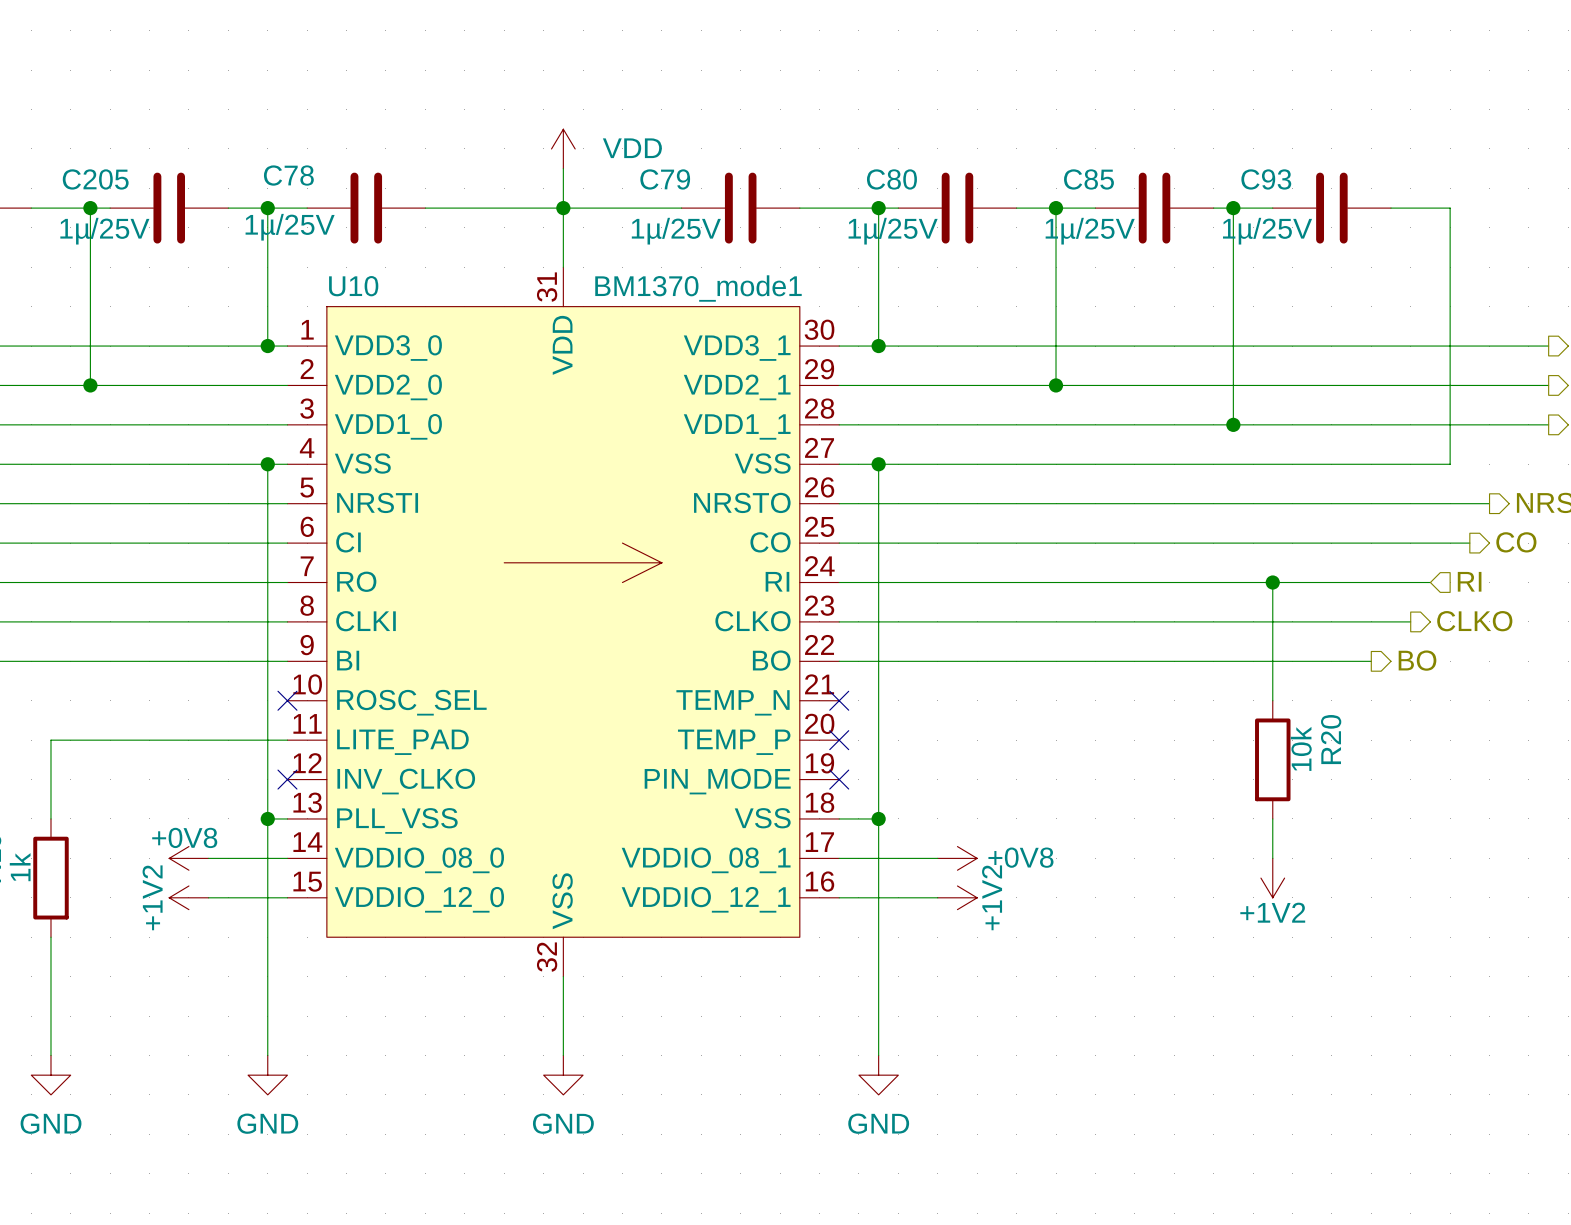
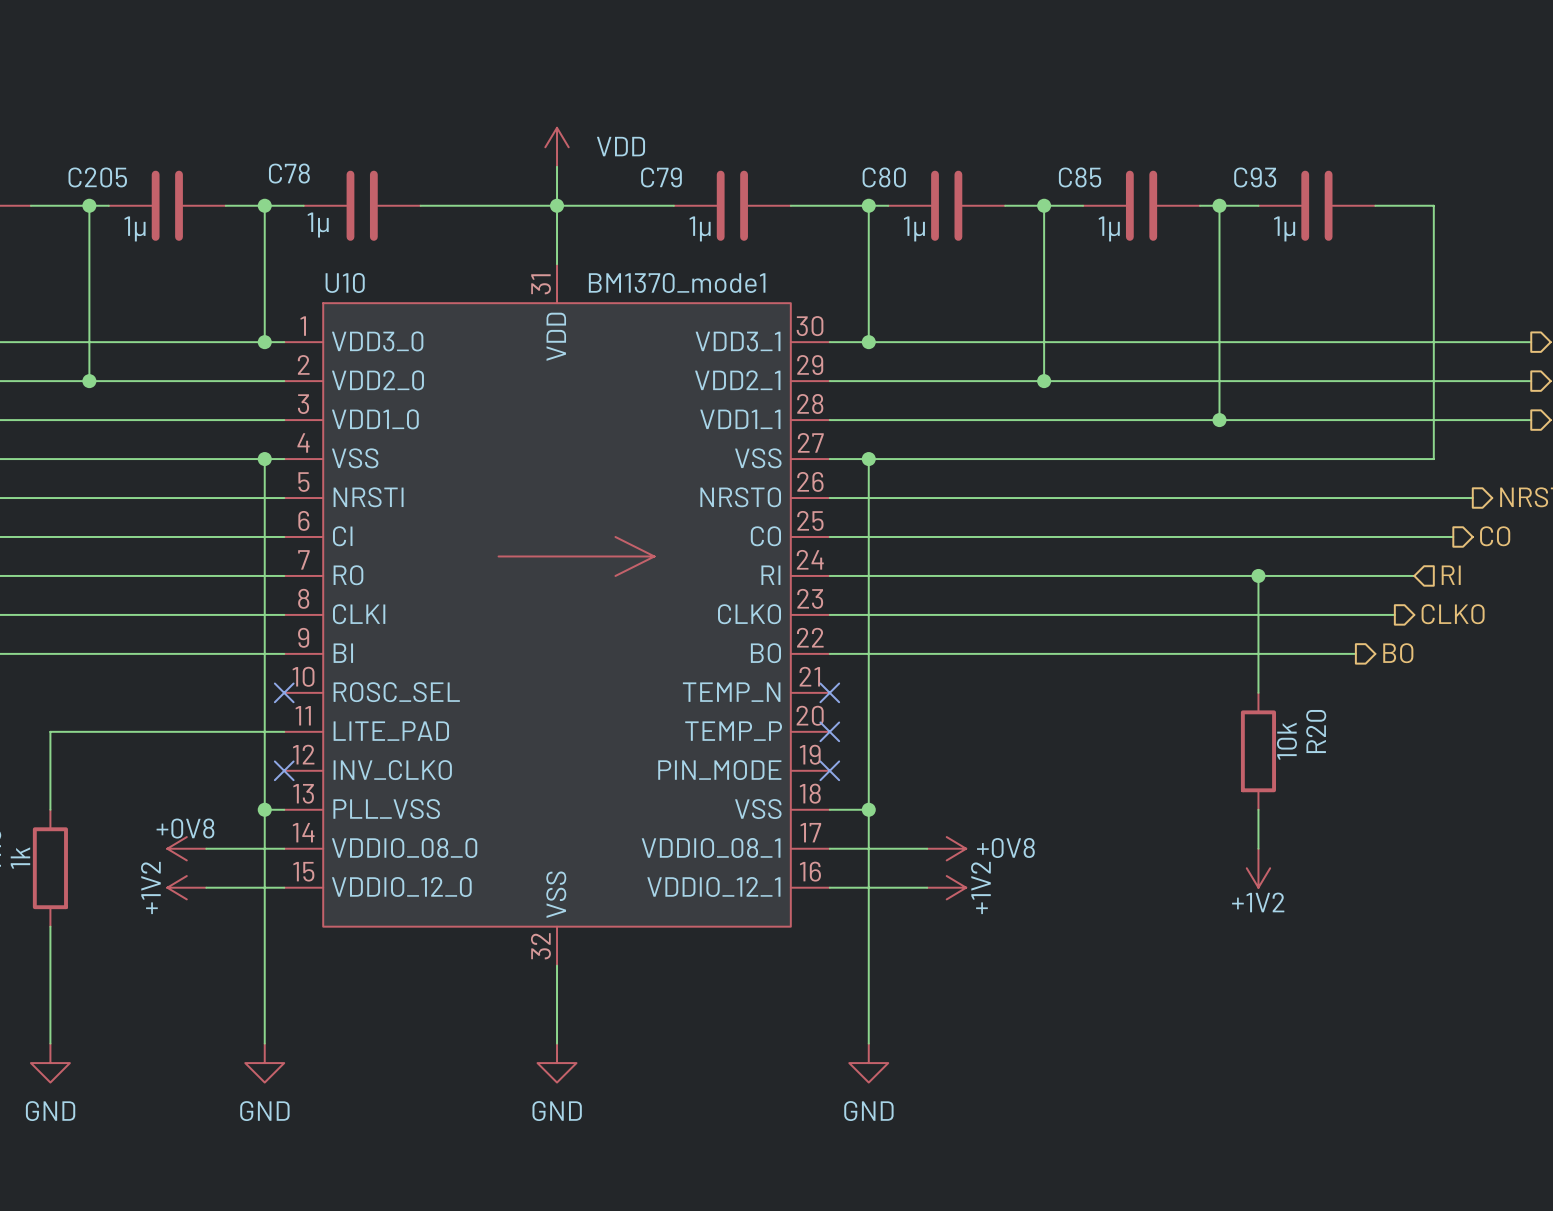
C78 value: 1µ/25V (290, 227) -> 1µ (318, 225)
C205 value: 1µ/25V (104, 231) -> 1µ (135, 228)
C79 value: 1µ/25V (676, 231) -> 1µ (700, 228)
C80 value: 1µ/25V (893, 231) -> 1µ (914, 228)
C85 value: 1µ/25V (1090, 231) -> 1µ (1109, 228)
C93 value: 1µ/25V (1267, 231) -> 1µ (1284, 228)

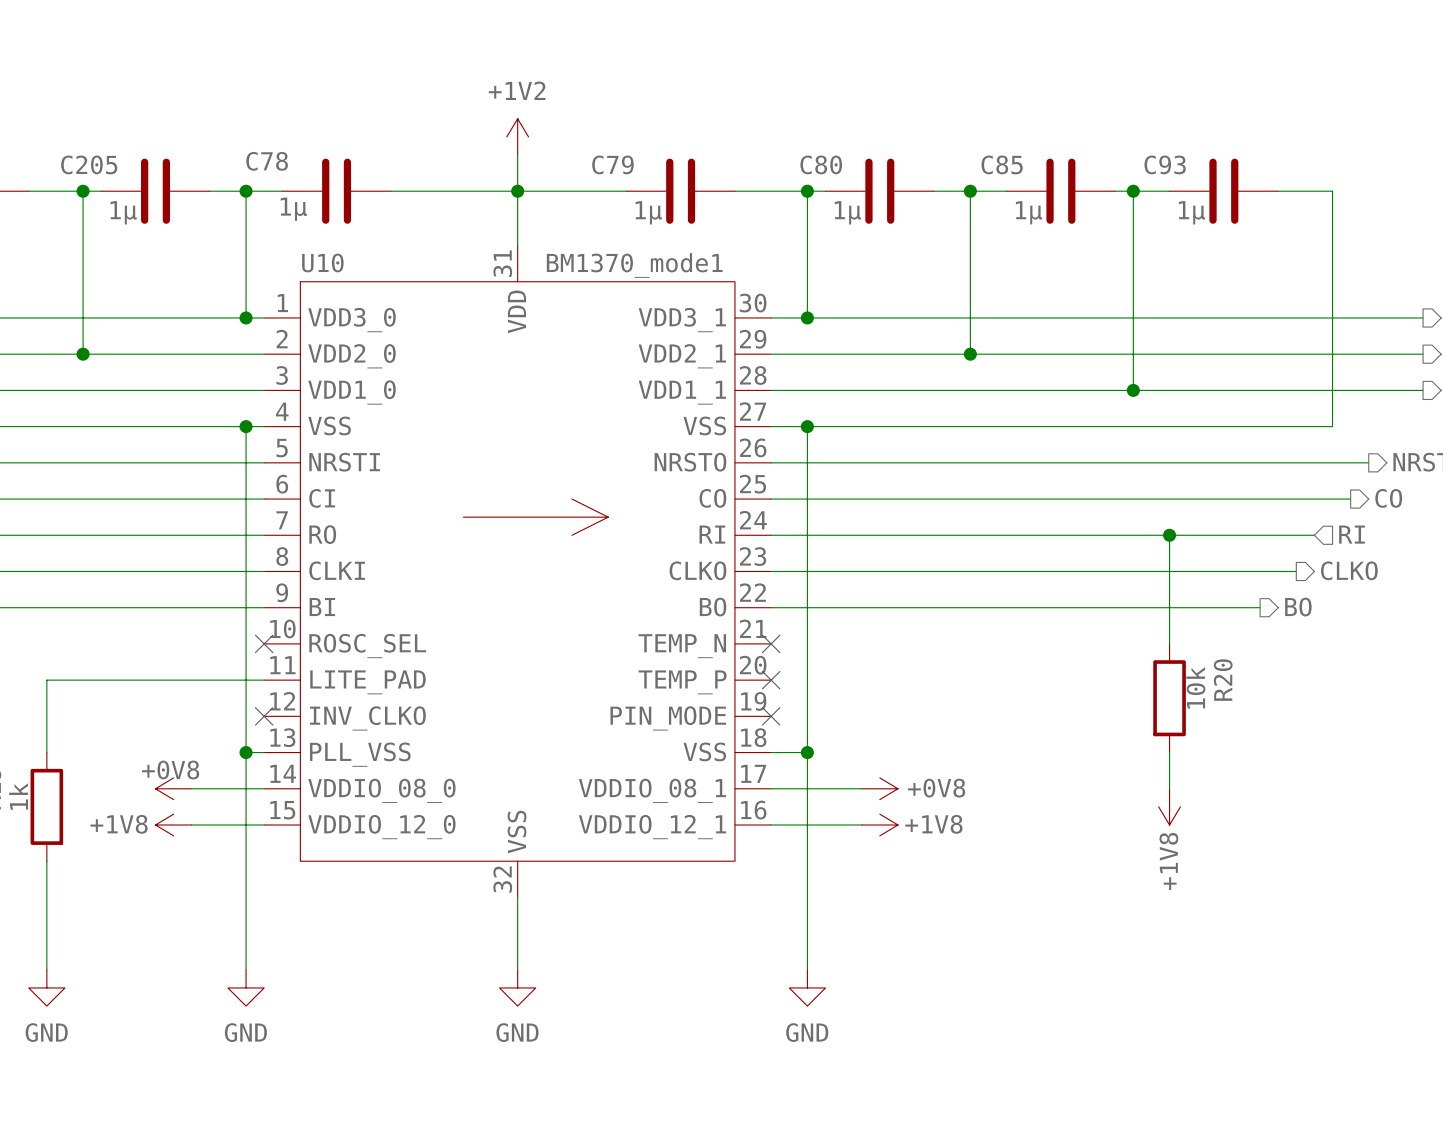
power symbol: VDD (557, 147) -> +1V2 (517, 136)
power symbol: +1V2 (1258, 868) -> +1V8 (1169, 806)
power symbol: +1V2 (186, 887) -> +1V8 (173, 825)
power symbol: +1V2 (946, 887) -> +1V8 (879, 825)

